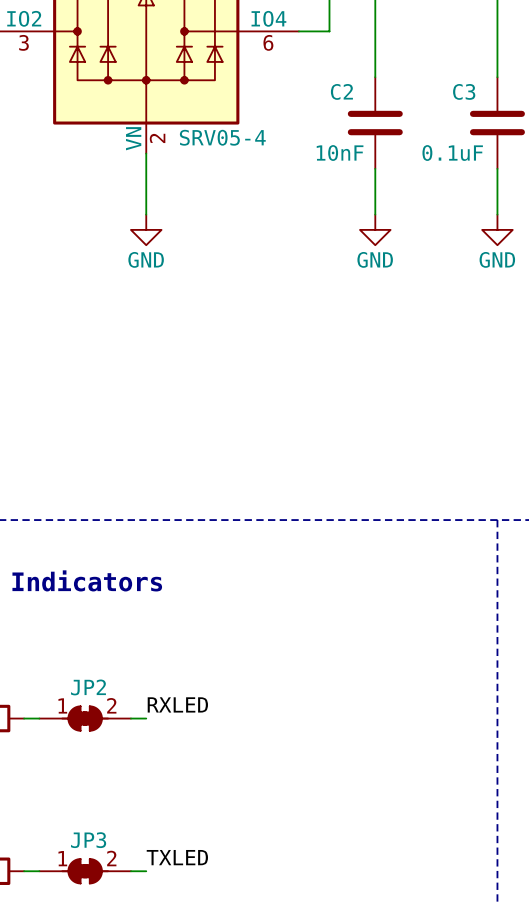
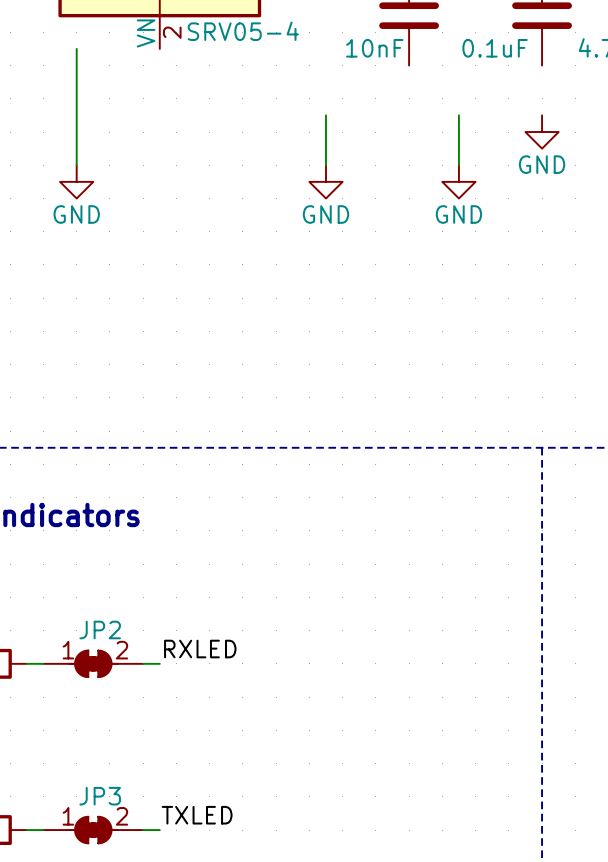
wire: none -> (76, 48) (76, 165)
wire: (146, 153) (146, 214) -> none
wire: (375, 168) (375, 214) -> (325, 115) (325, 165)
wire: (497, 168) (497, 214) -> (458, 115) (458, 165)
power symbol: GND (146, 229) -> none
power symbol: GND (375, 229) -> none
power symbol: none -> GND (76, 181)
power symbol: none -> GND (325, 181)
power symbol: none -> GND (458, 181)

